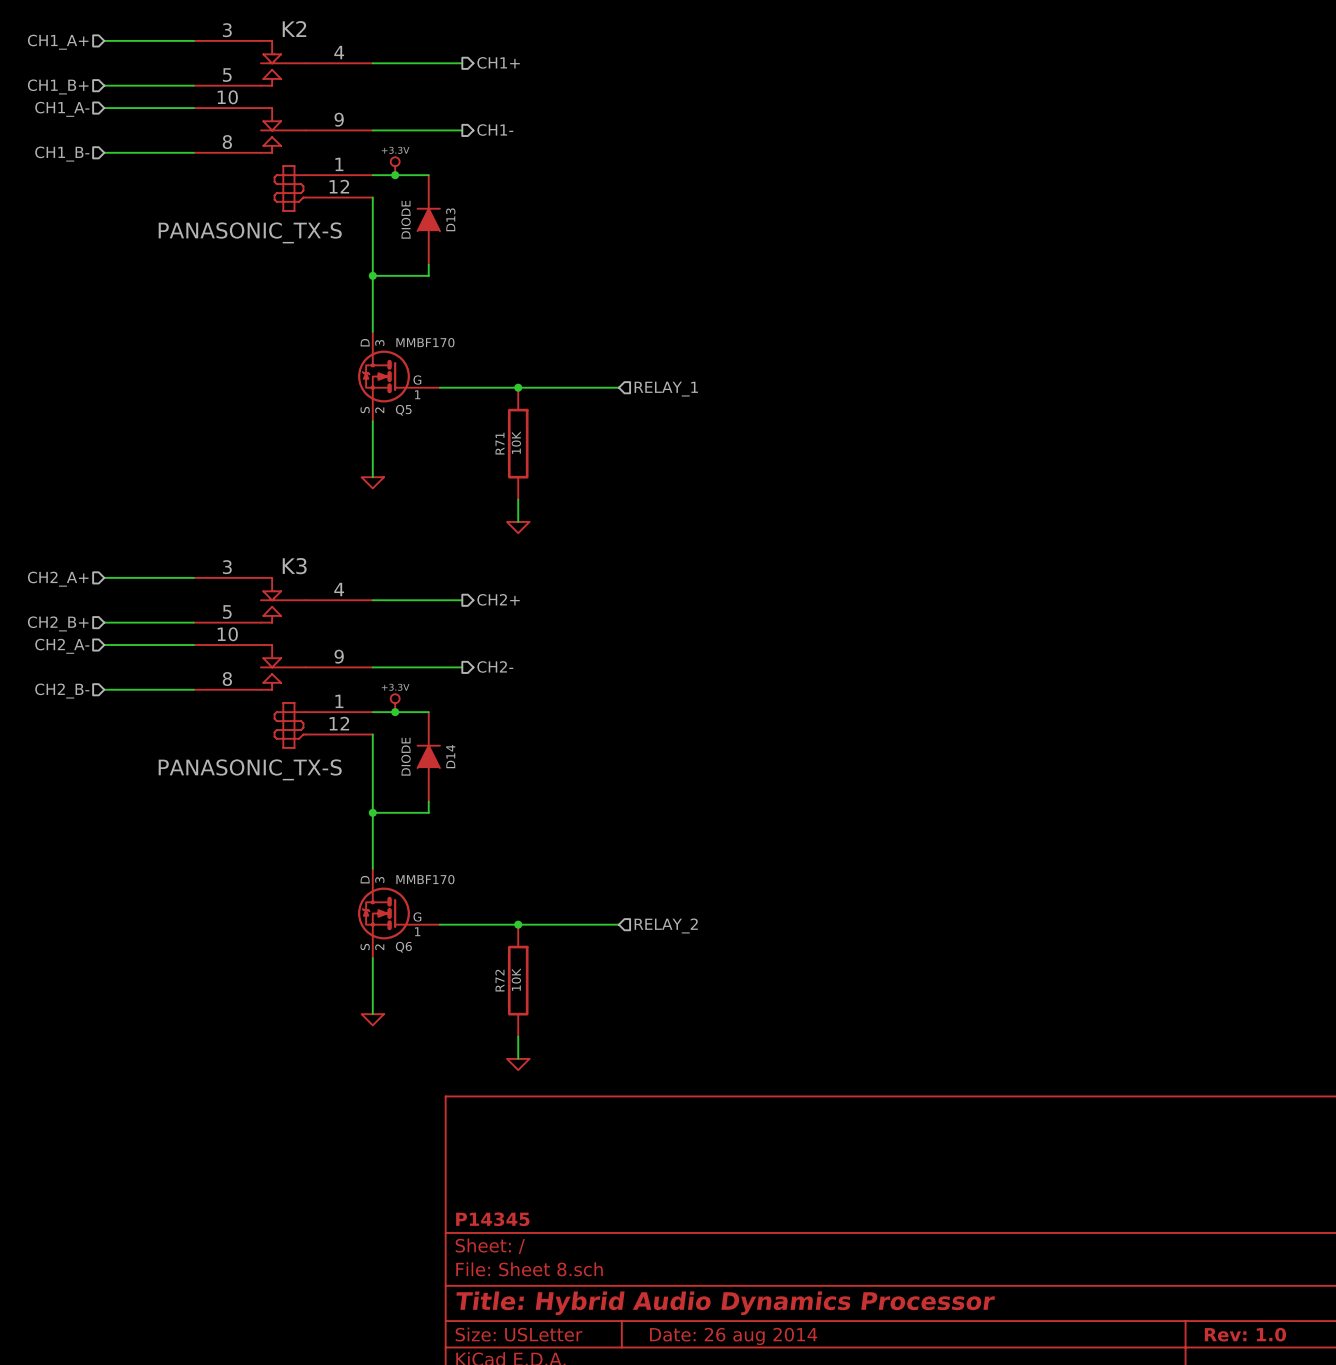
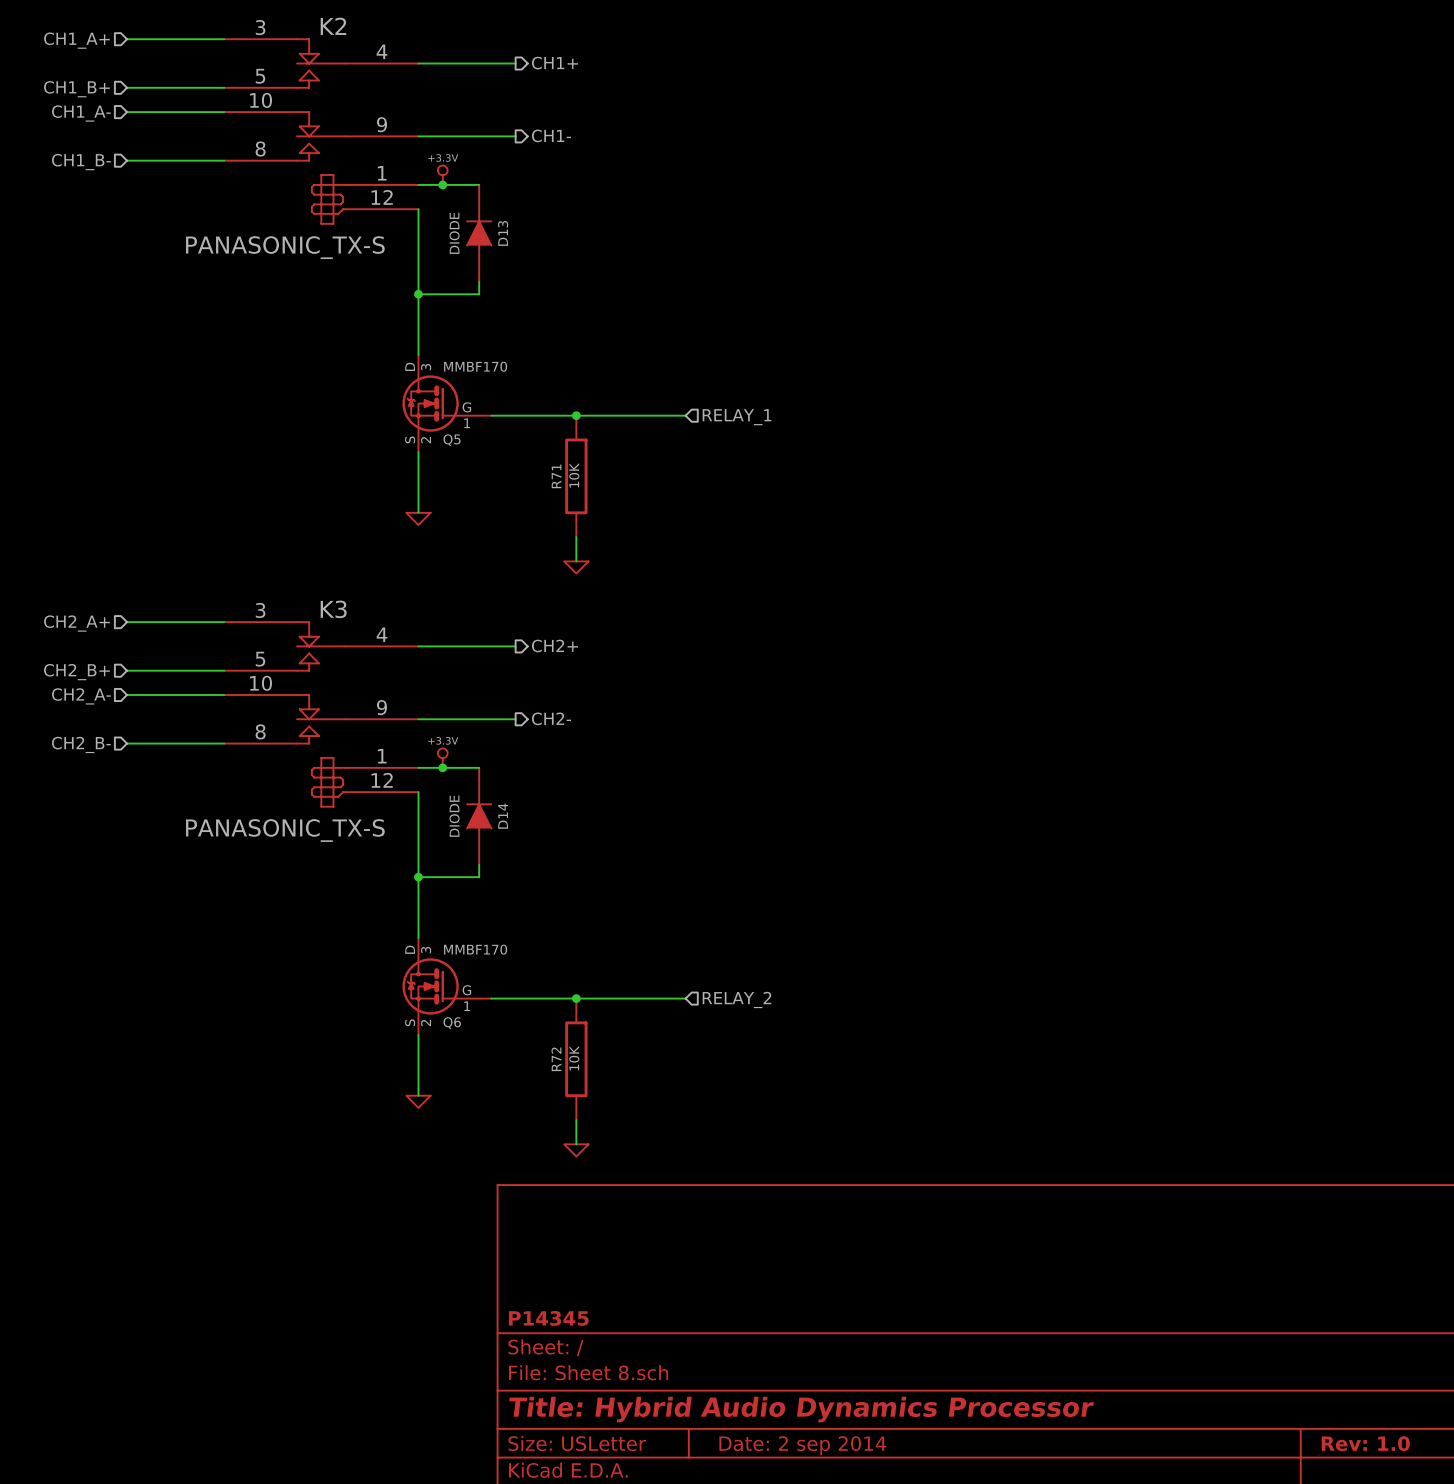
title block: Date: 26 aug 2014 (733, 1336) -> Date: 2 sep 2014 (802, 1445)

